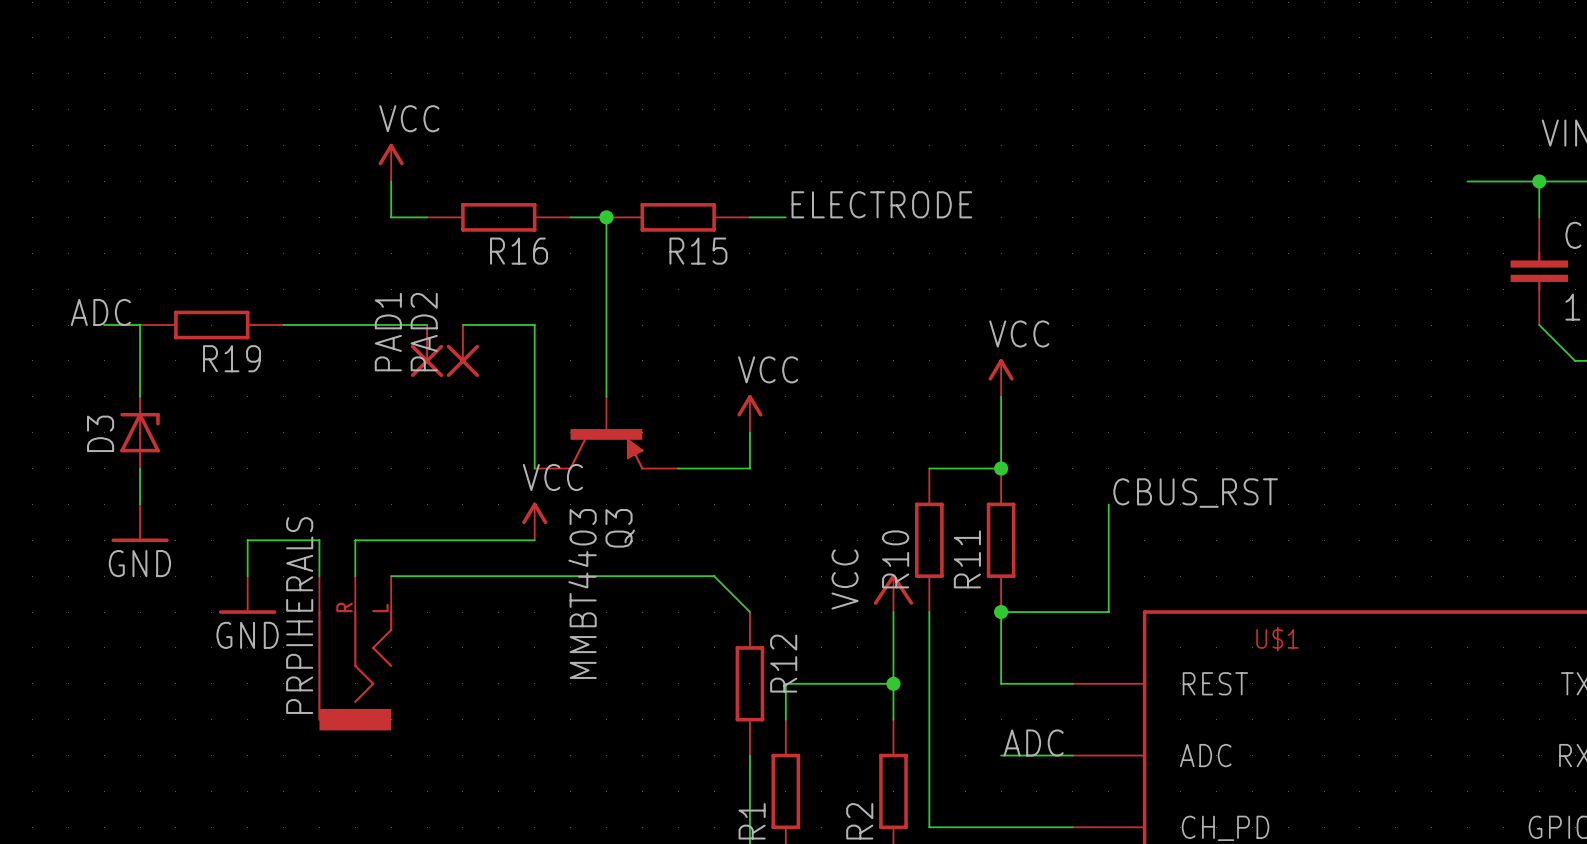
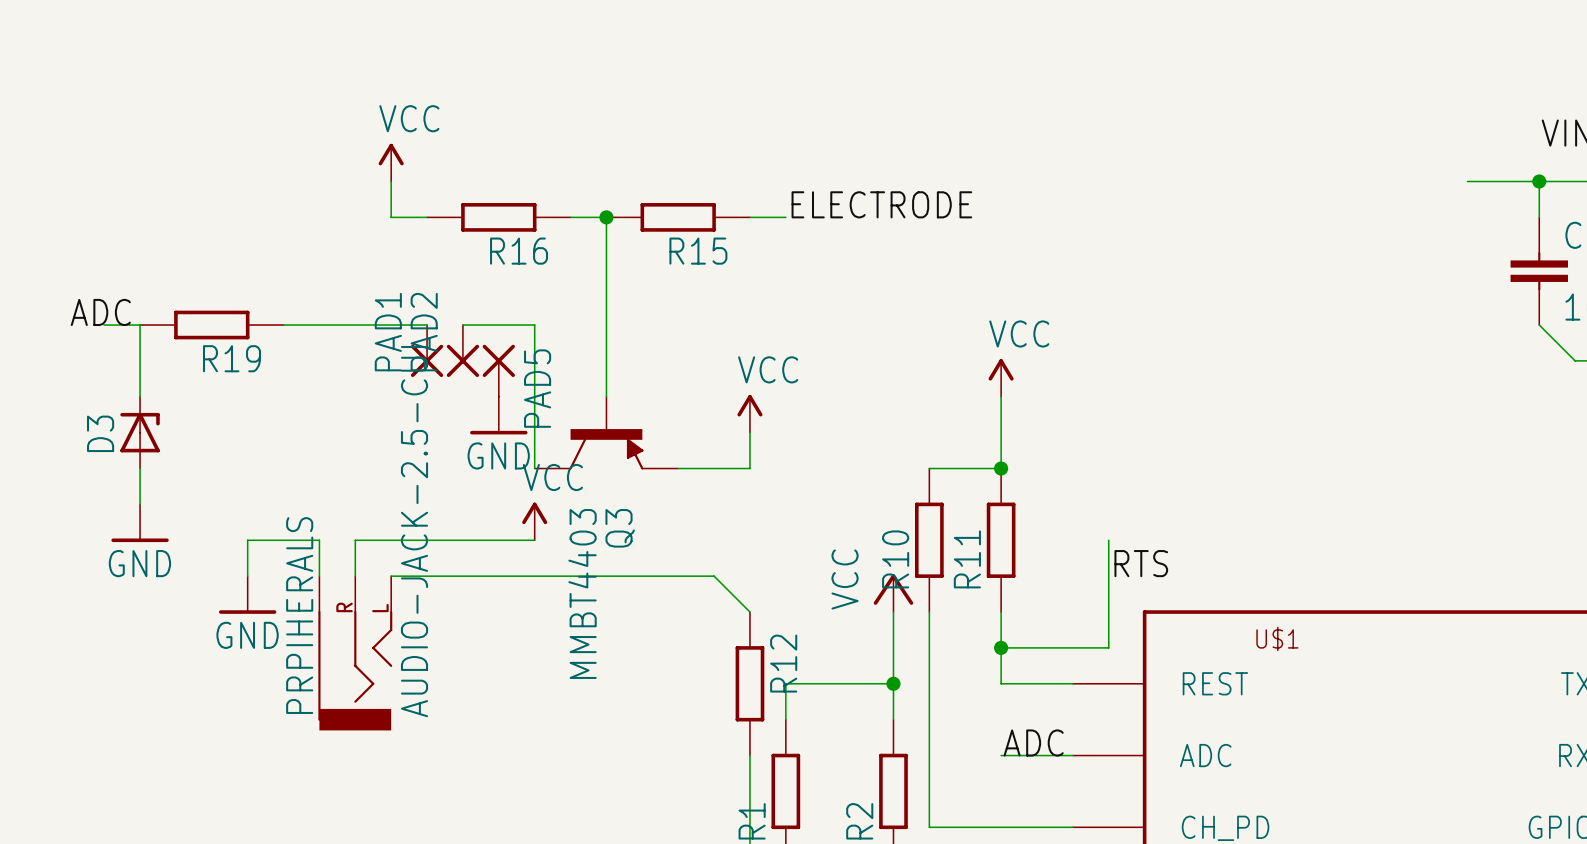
PAD5: none -> (498, 370)
power symbol: none -> GND (498, 415)
label: CBUS_RST (1195, 493) -> none
wire: (1108, 504) (1108, 540) -> none
PRPIHERALS value: none -> AUDIO-JACK-2.5-CUI (414, 531)
label: none -> RTS (1141, 563)
wire: (1001, 612) (1108, 612) -> (1001, 647) (1108, 647) (1108, 612)
junction position: (1001, 612) -> (1001, 647)

